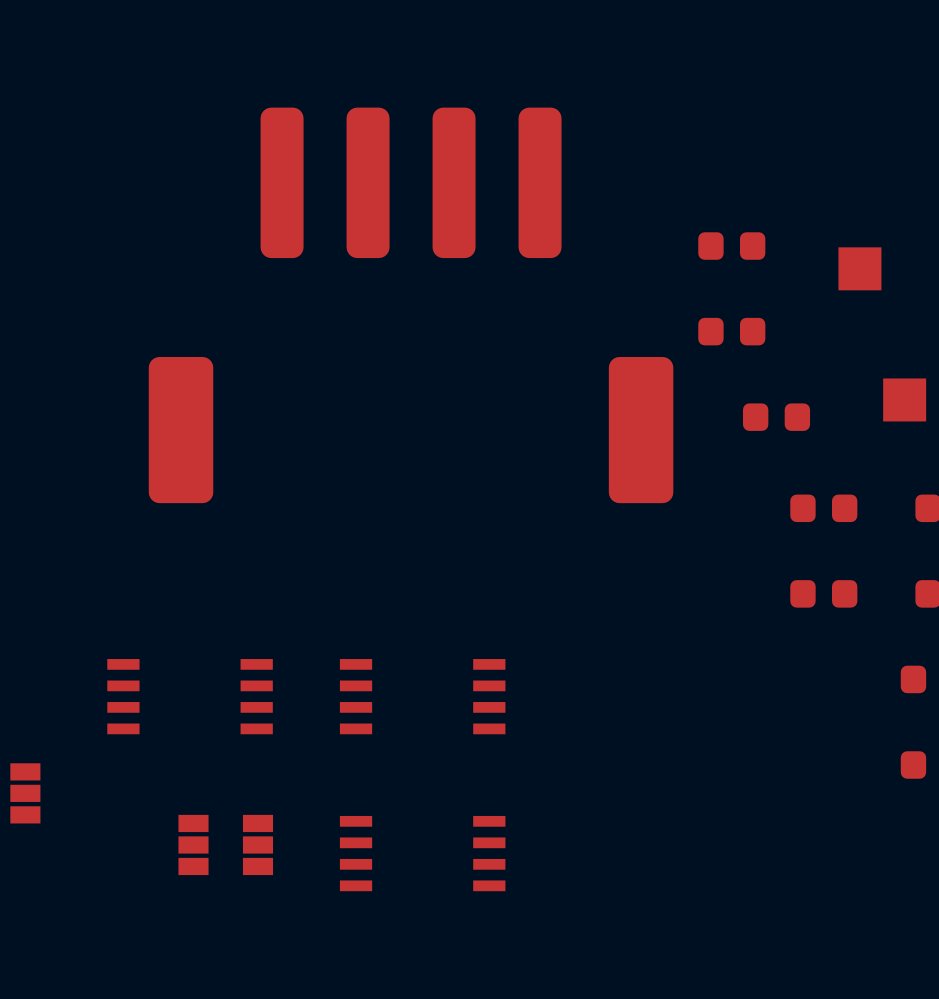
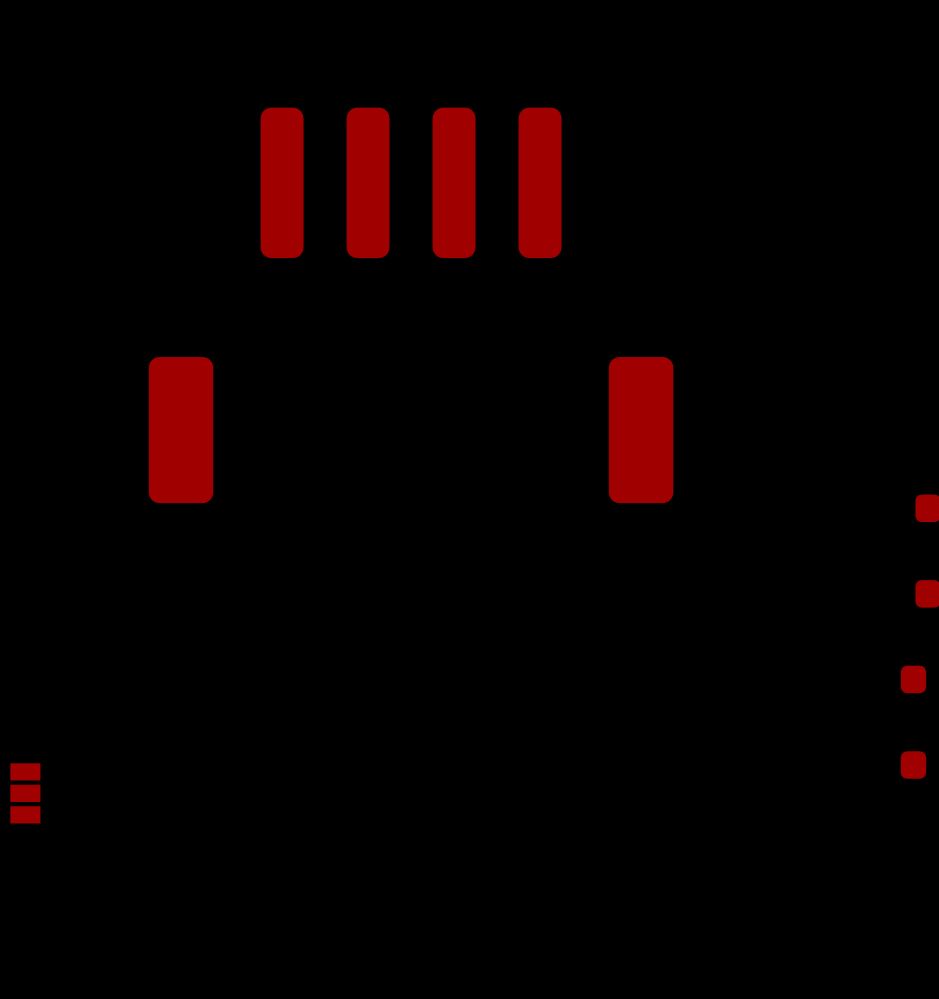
part: (731, 246) -> none
part: (859, 268) -> none
part: (731, 331) -> none
part: (904, 399) -> none
part: (776, 417) -> none
part: (823, 508) -> none
part: (823, 593) -> none
part: (190, 696) -> none
part: (422, 696) -> none
part: (225, 844) -> none
part: (422, 853) -> none

